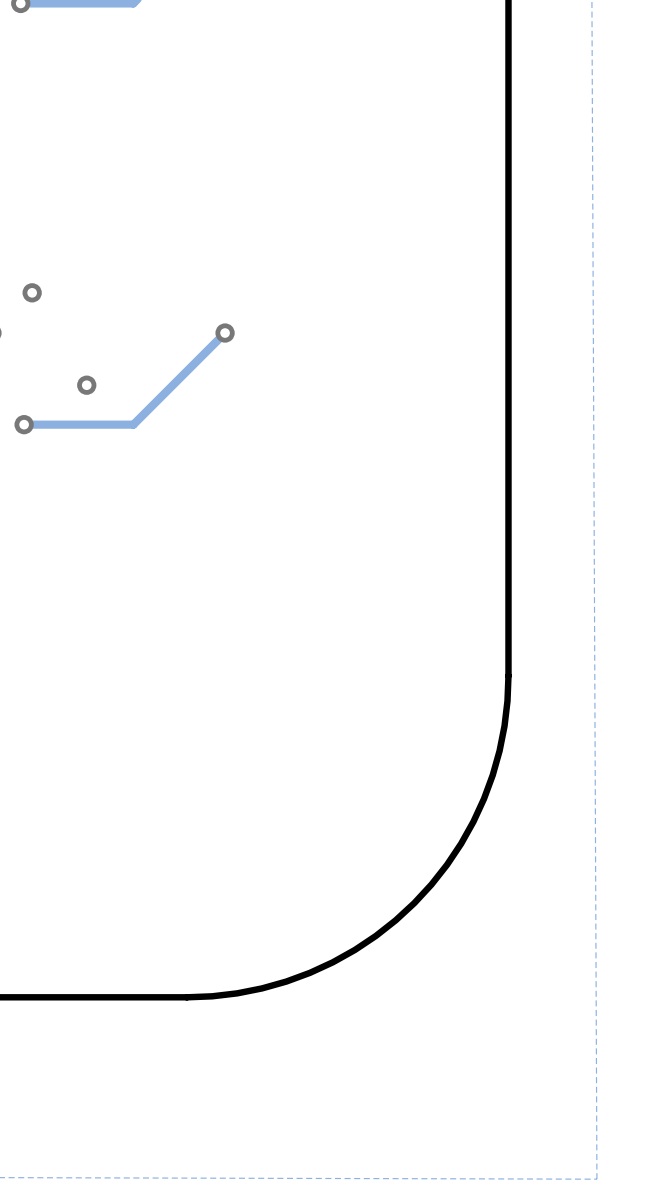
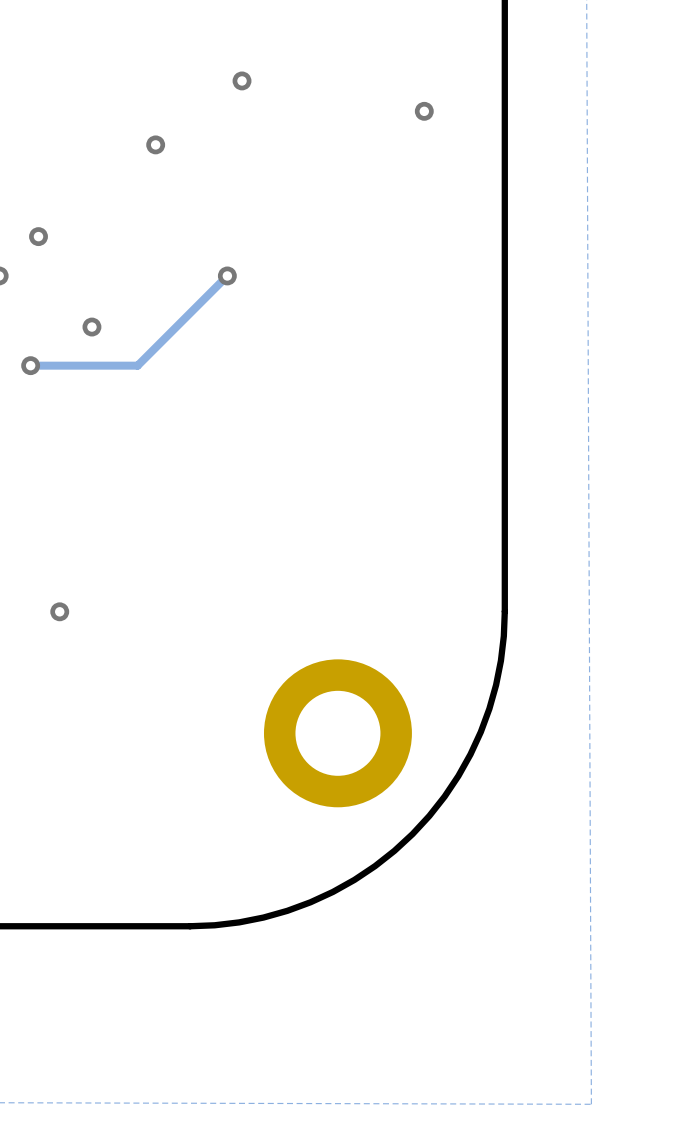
via: none -> (242, 80)
via: none -> (424, 111)
via: none -> (155, 144)
via: none -> (59, 611)
part: none -> (337, 733)

